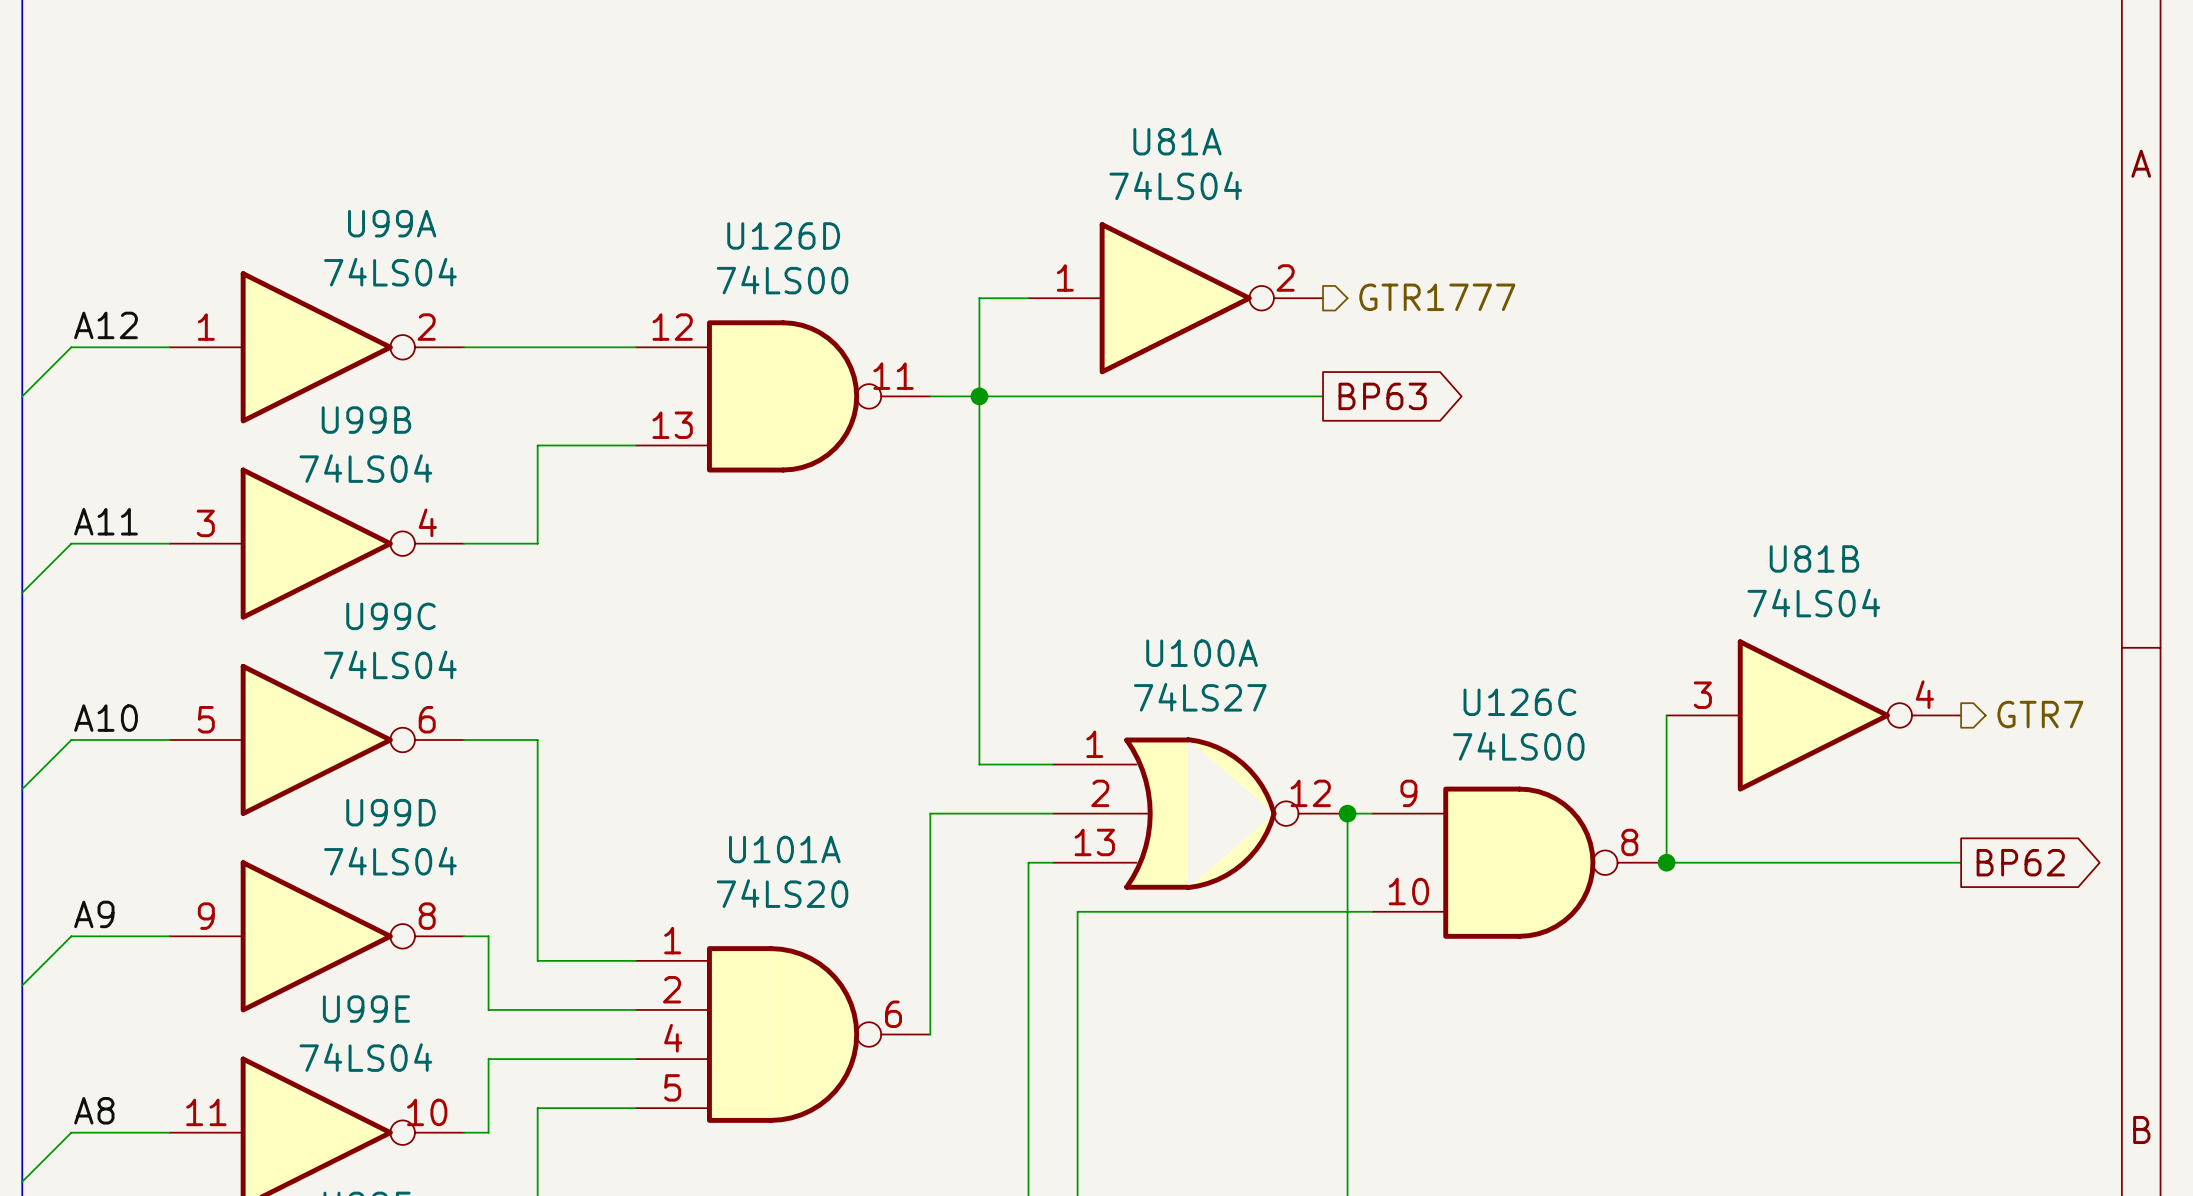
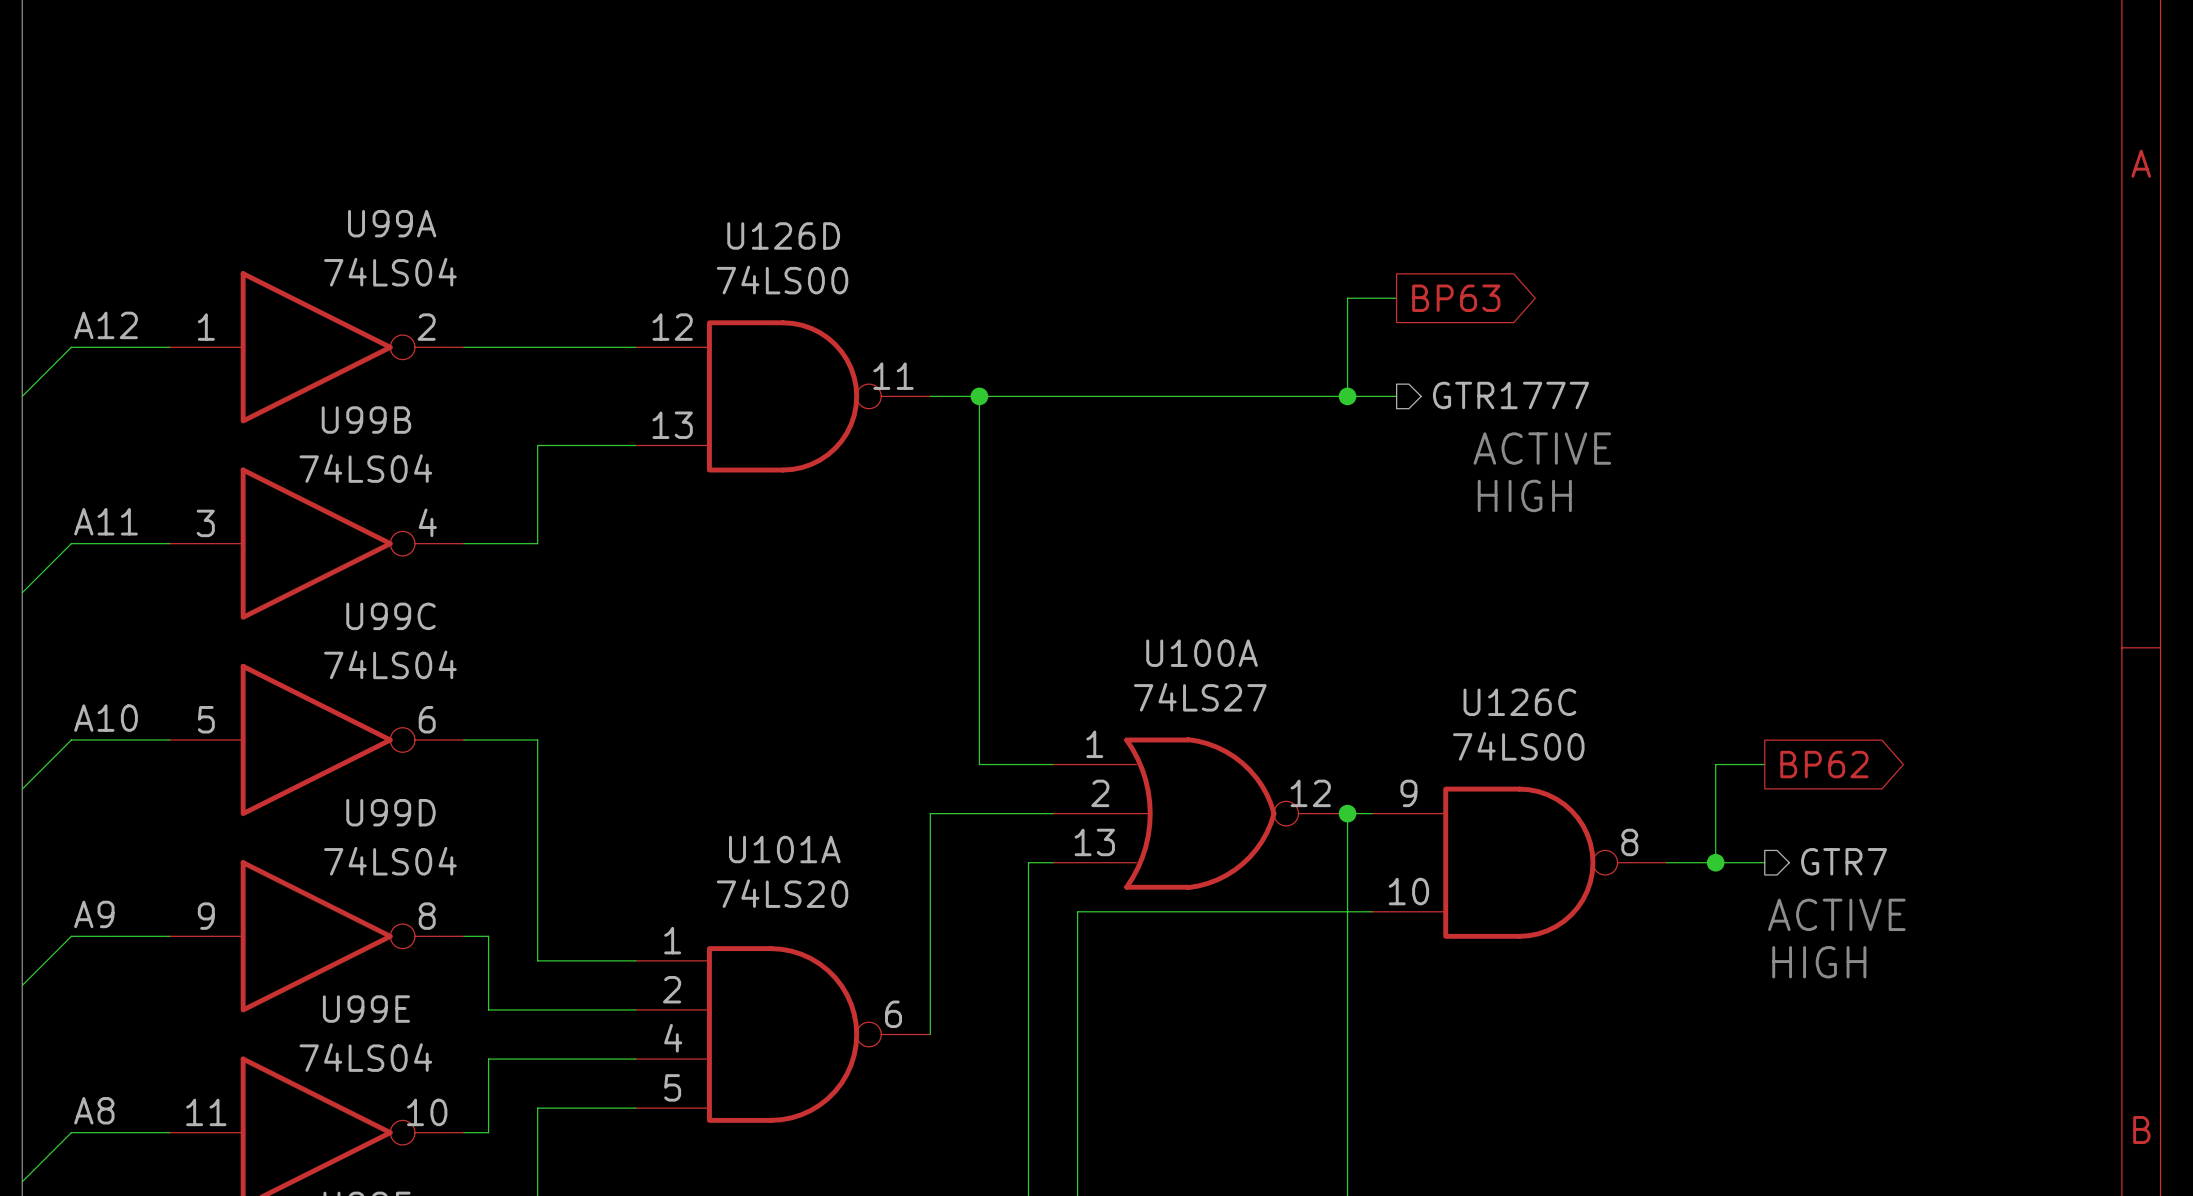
hierarchical label position: GTR1777 (1437, 297) -> GTR1777 (1510, 395)
wire: (1028, 298) (979, 298) (979, 396) -> (1396, 298) (1347, 298) (1347, 396)
U81A: 74LS04 (1175, 298) -> none
wire: none -> (1323, 396) (1396, 396)
junction: none -> (1347, 396)
global label position: BP63 (1382, 396) -> BP63 (1456, 298)
text: none -> ACTIVE (1542, 448)
text: none -> HIGH (1524, 495)
hierarchical label position: GTR7 (2040, 714) -> GTR7 (1844, 861)
wire: (1666, 715) (1666, 862) -> none
U81B: 74LS04 (1813, 715) -> none
wire: none -> (1764, 764) (1715, 764) (1715, 862)
junction position: (1666, 862) -> (1715, 862)
wire: (1764, 862) (1961, 862) -> none
global label position: BP62 (2020, 862) -> BP62 (1824, 764)
text: none -> ACTIVE (1836, 914)
text: none -> HIGH (1819, 962)

